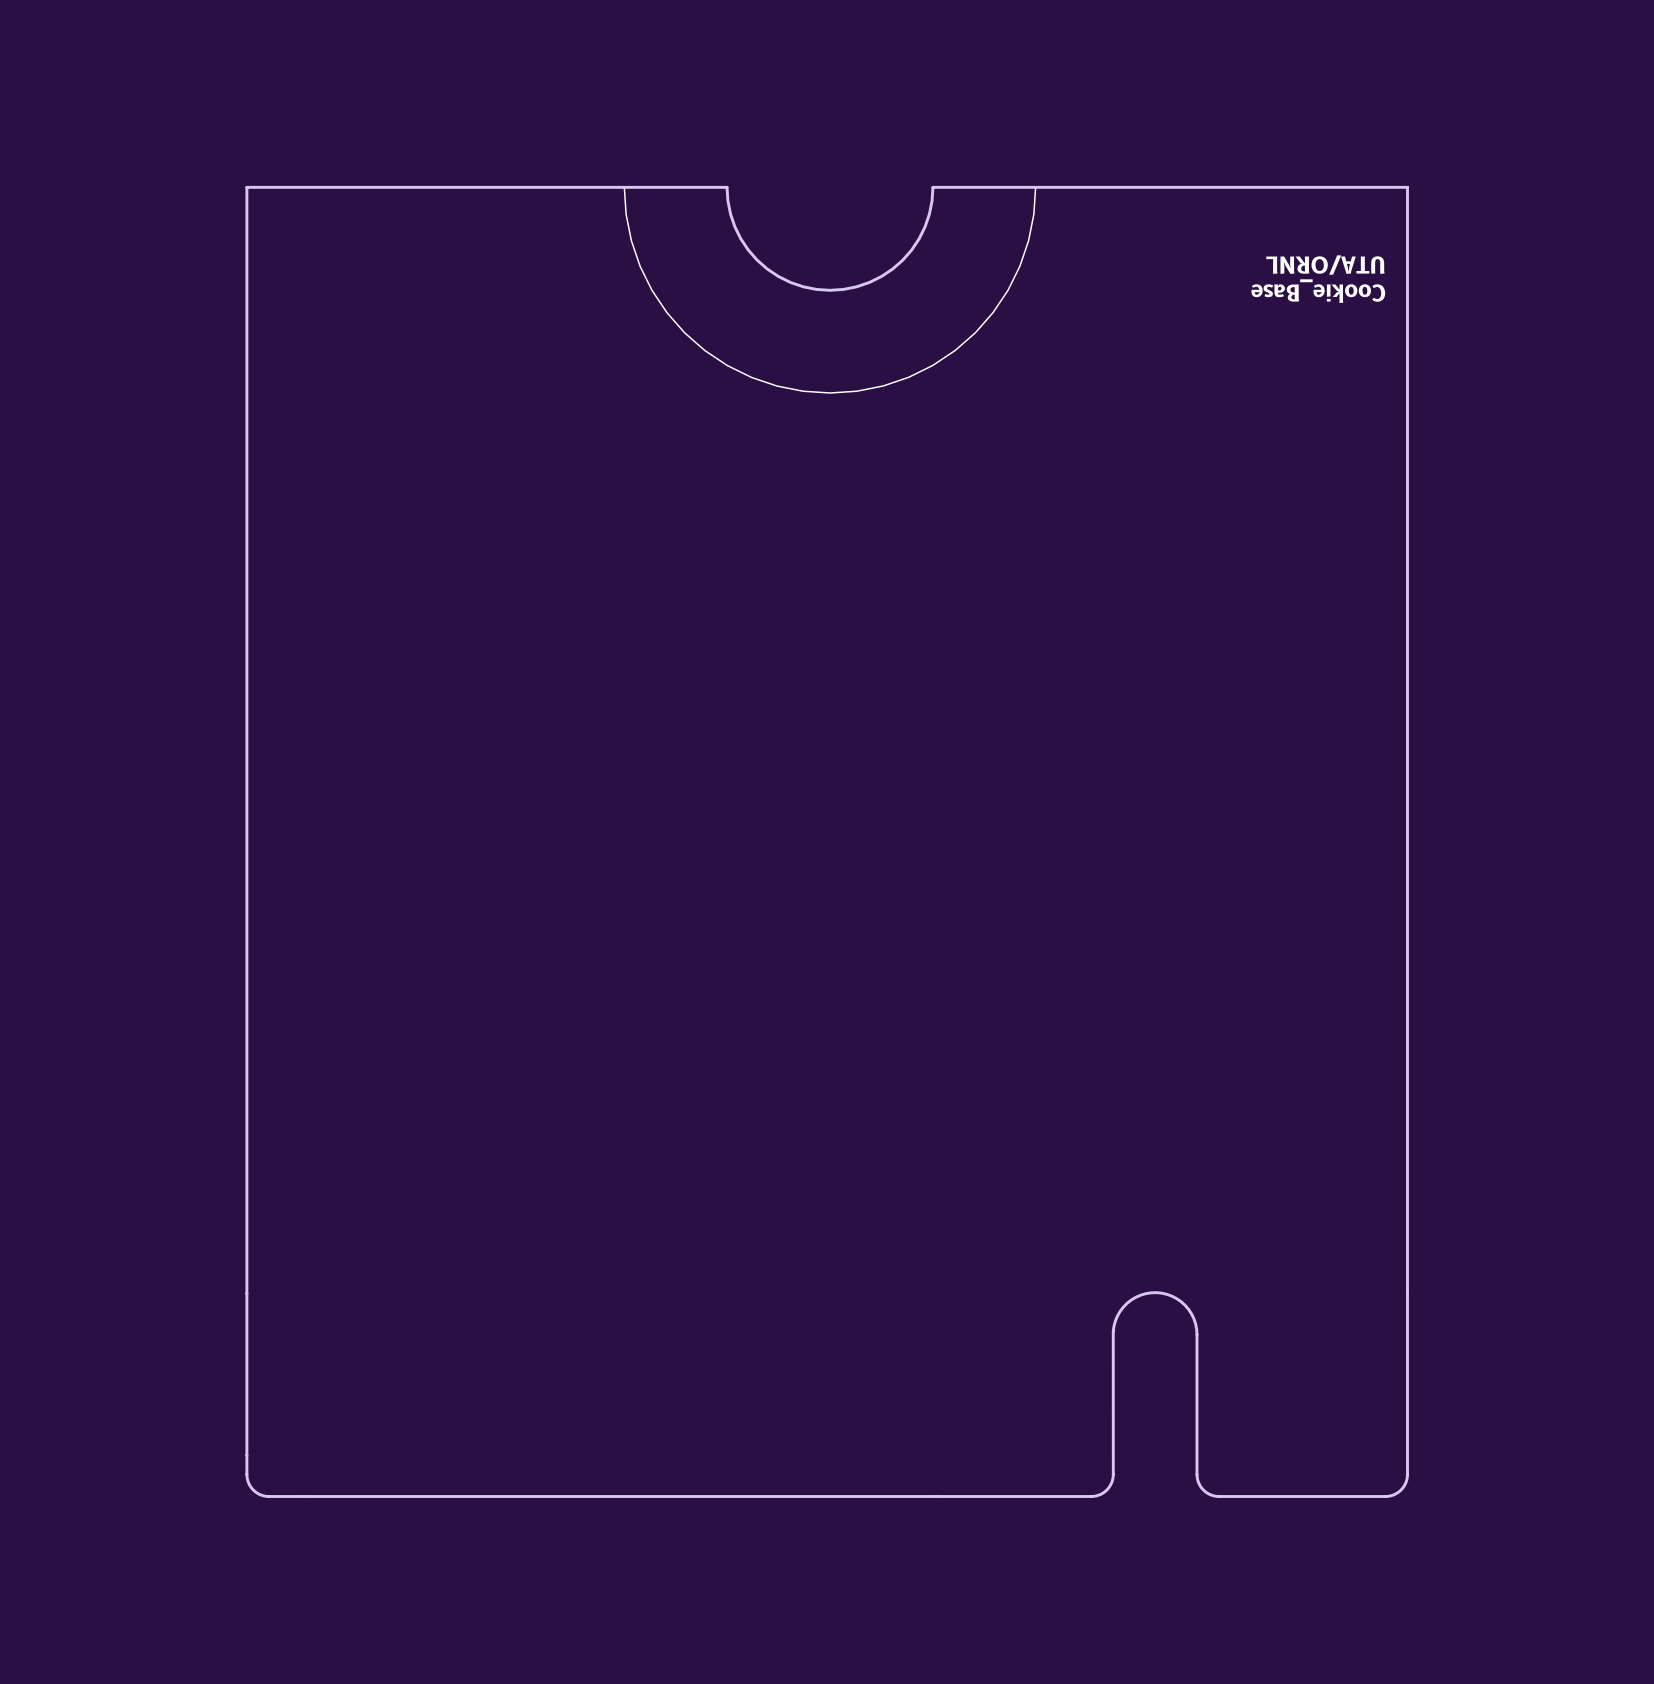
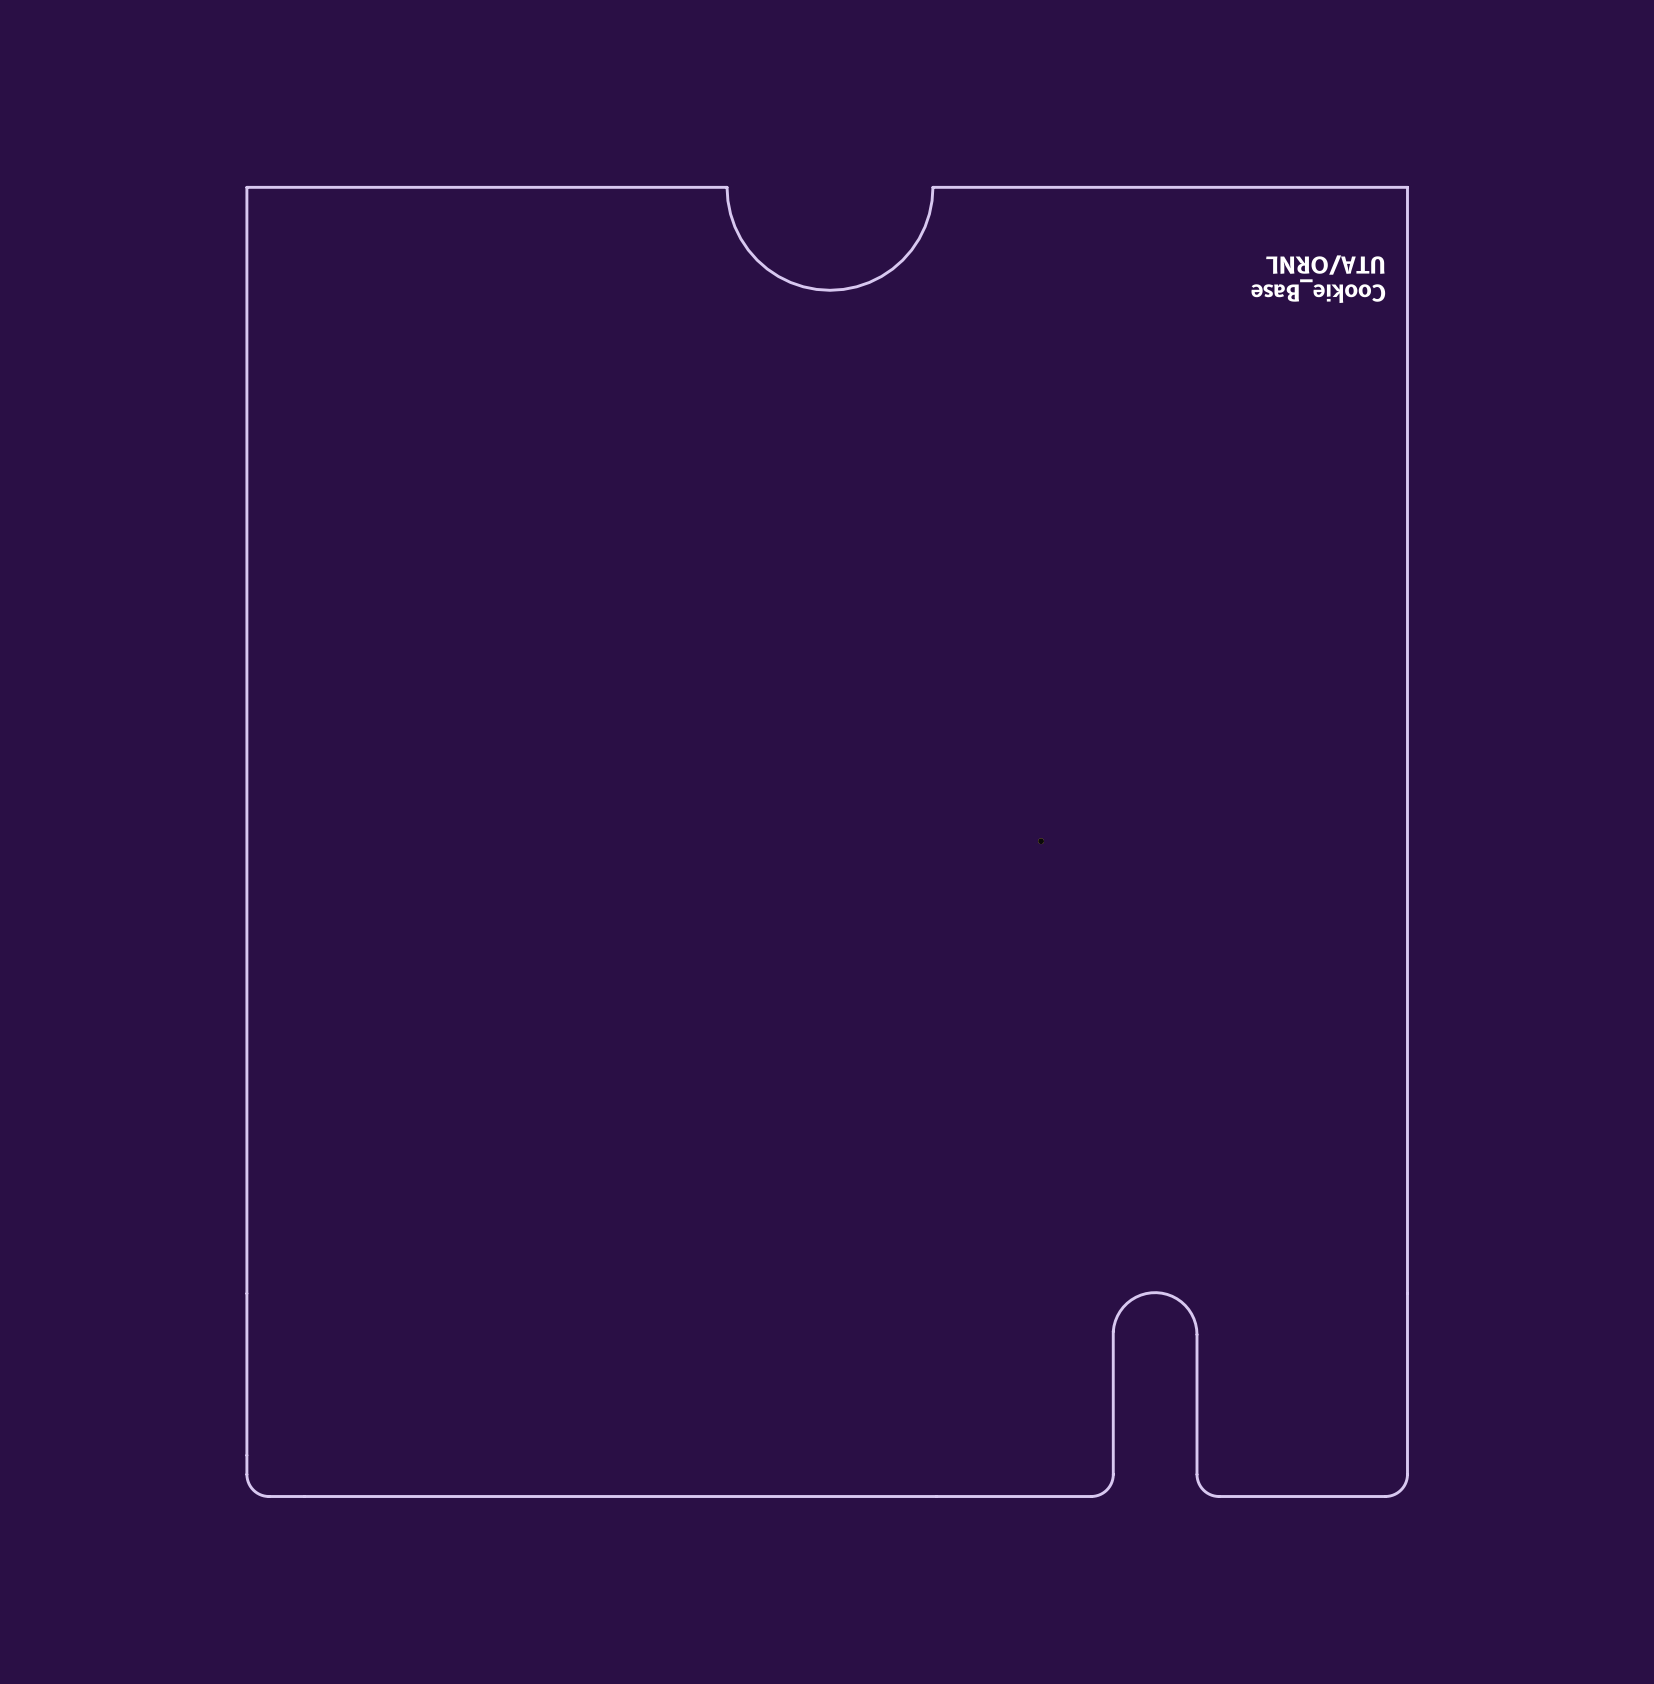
line: (624, 187) (626, 214) (631, 240) (640, 266) (652, 290) (666, 312) (684, 332) (704, 350) (727, 365) (751, 377) (776, 386) (803, 391) (830, 392) (856, 391) (883, 385) (908, 377) (932, 365) (955, 350) (975, 332) (993, 312) (1008, 290) (1019, 266) (1028, 240) (1033, 214) (1035, 187) -> none
part: none -> (1041, 841)

